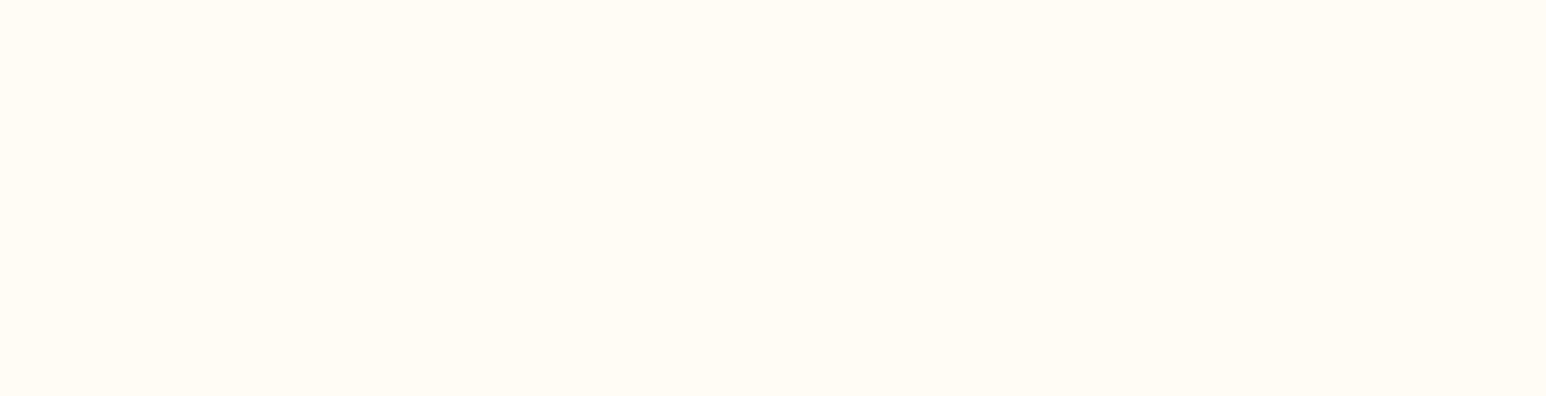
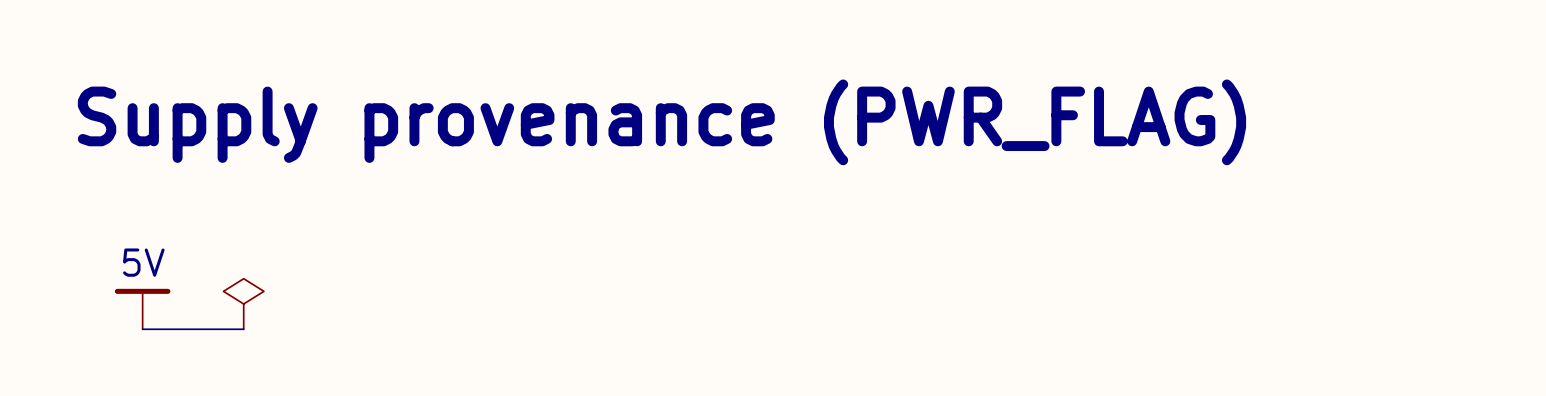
text: none -> Supply provenance (PWR_FLAG) (661, 122)
power symbol: none -> (243, 303)
power symbol: none -> 5V (142, 309)
wire: none -> (142, 329) (243, 329)

